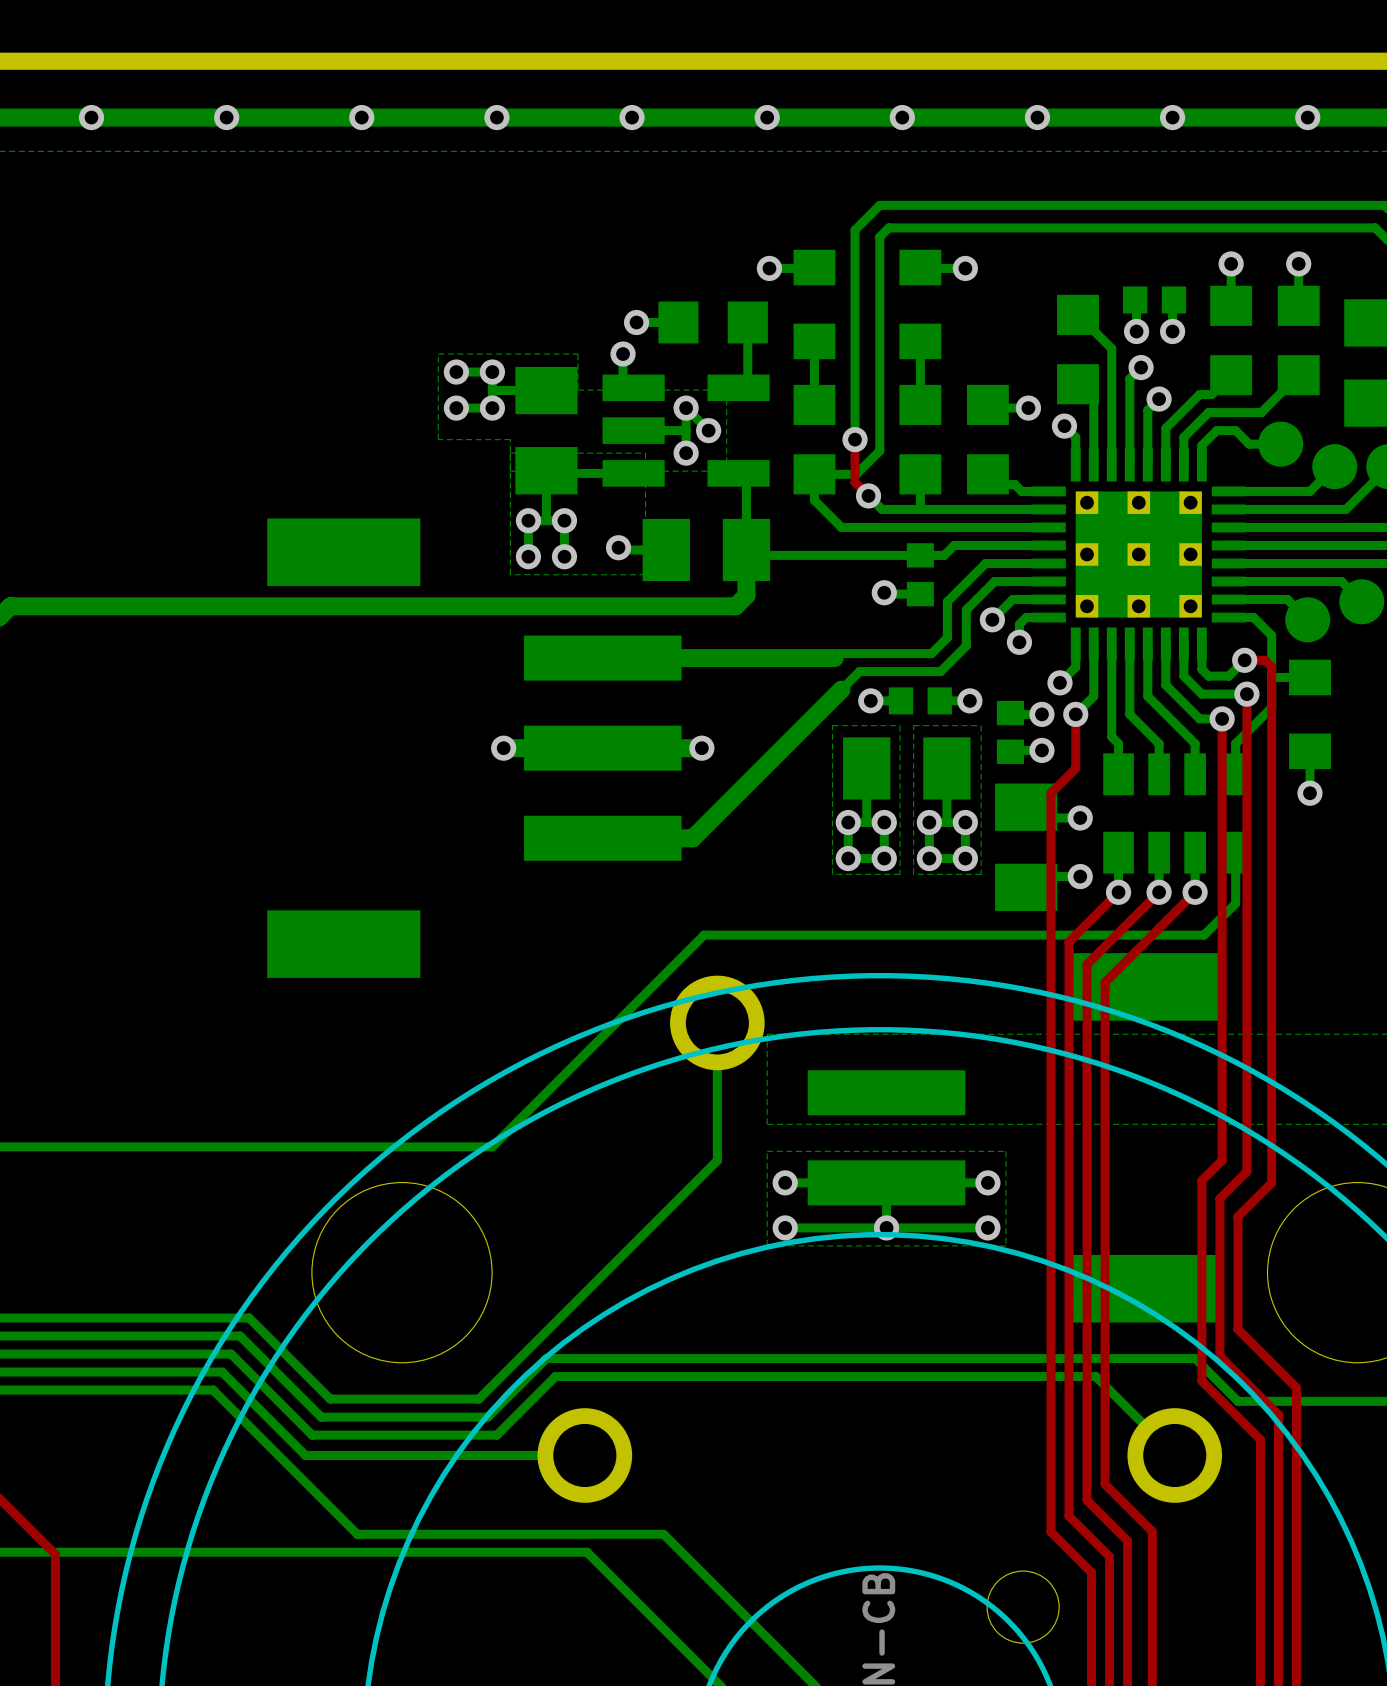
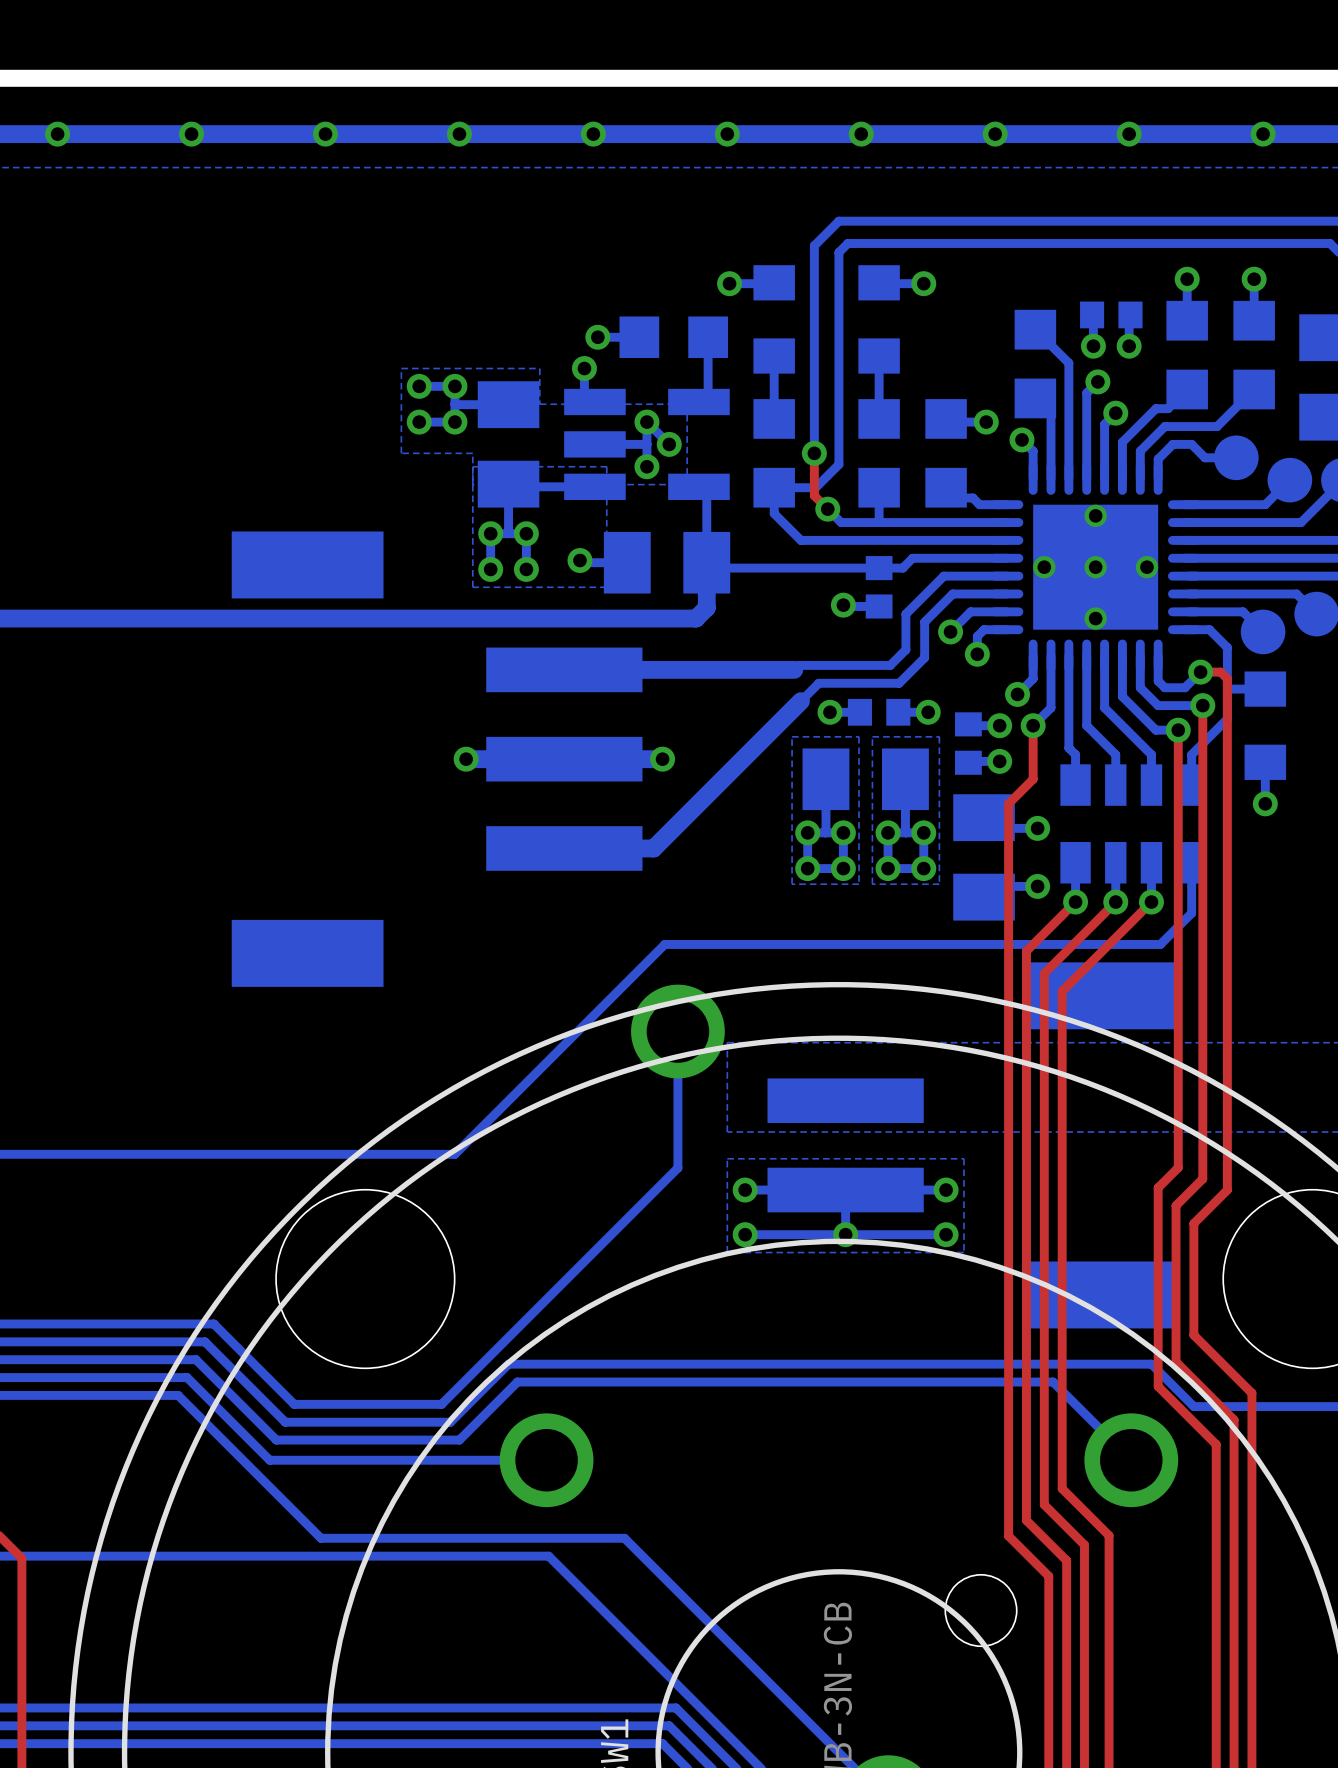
part footprint: [1032, 448, 1246, 661] -> [990, 461, 1202, 673]

